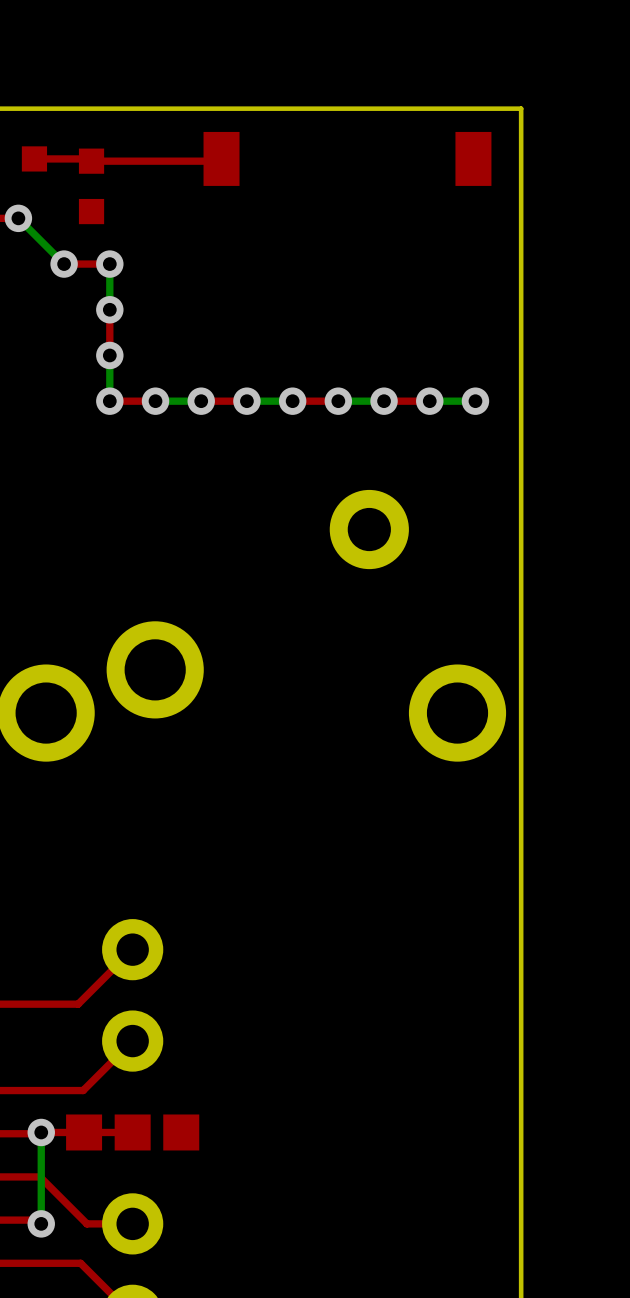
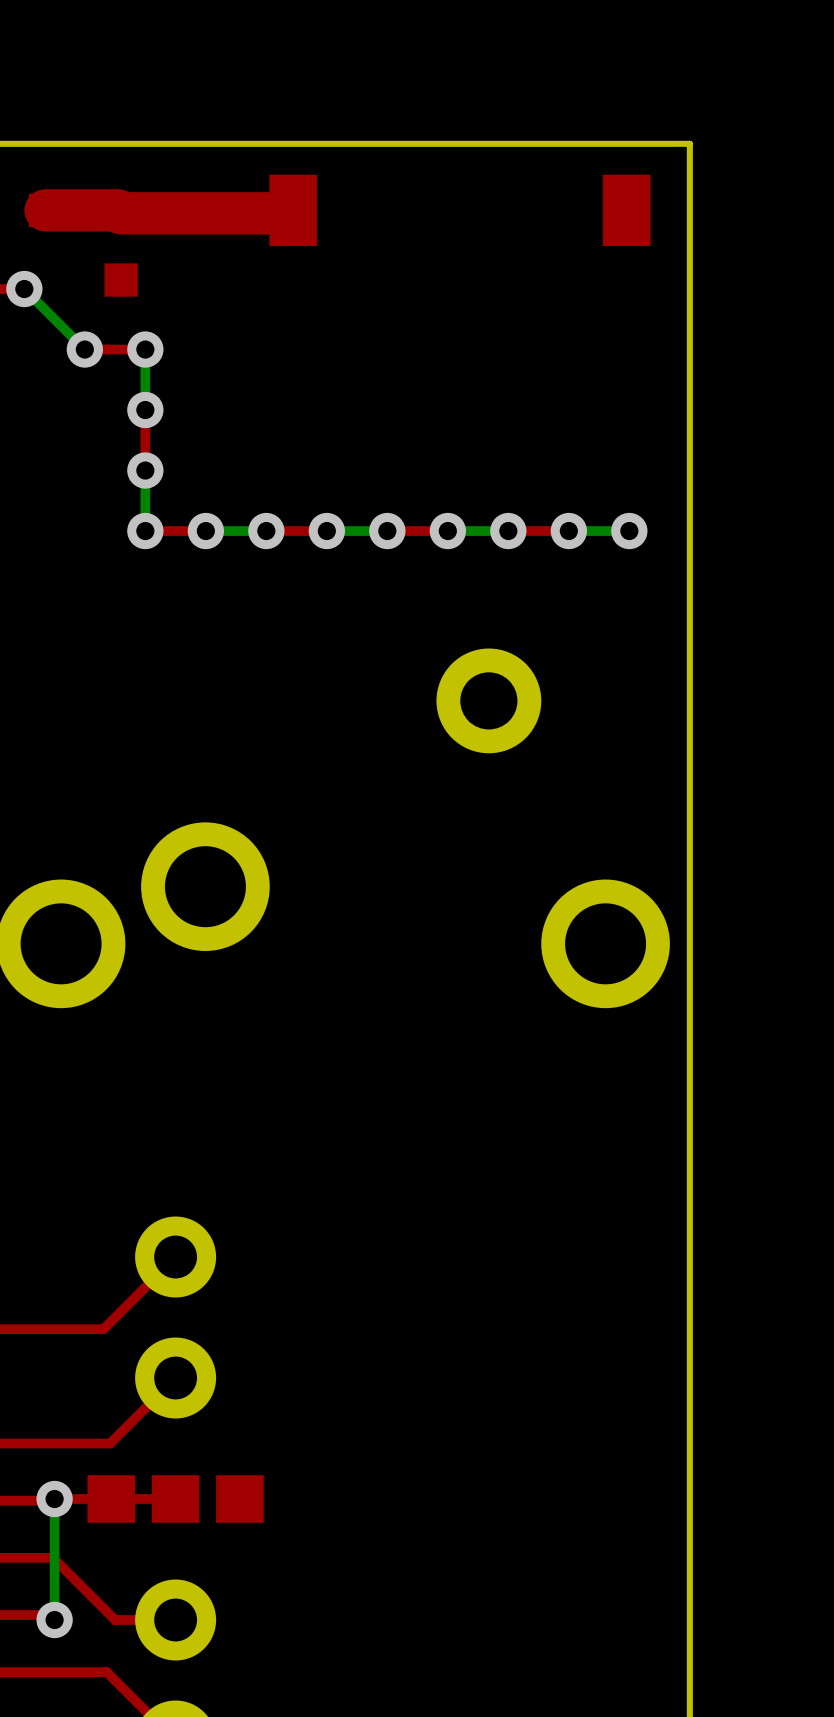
top track width: thin (89, 158) (34, 158) -> thick (118, 210) (45, 210)
top track width: thin (219, 161) (91, 161) -> thick (290, 213) (121, 213)

